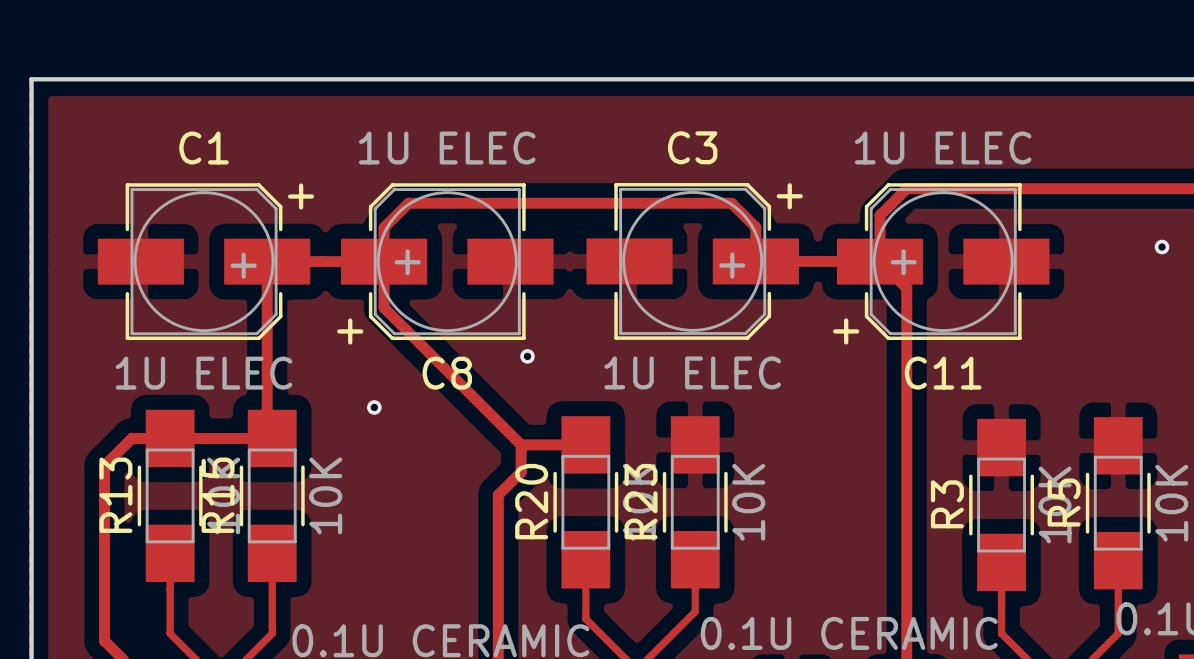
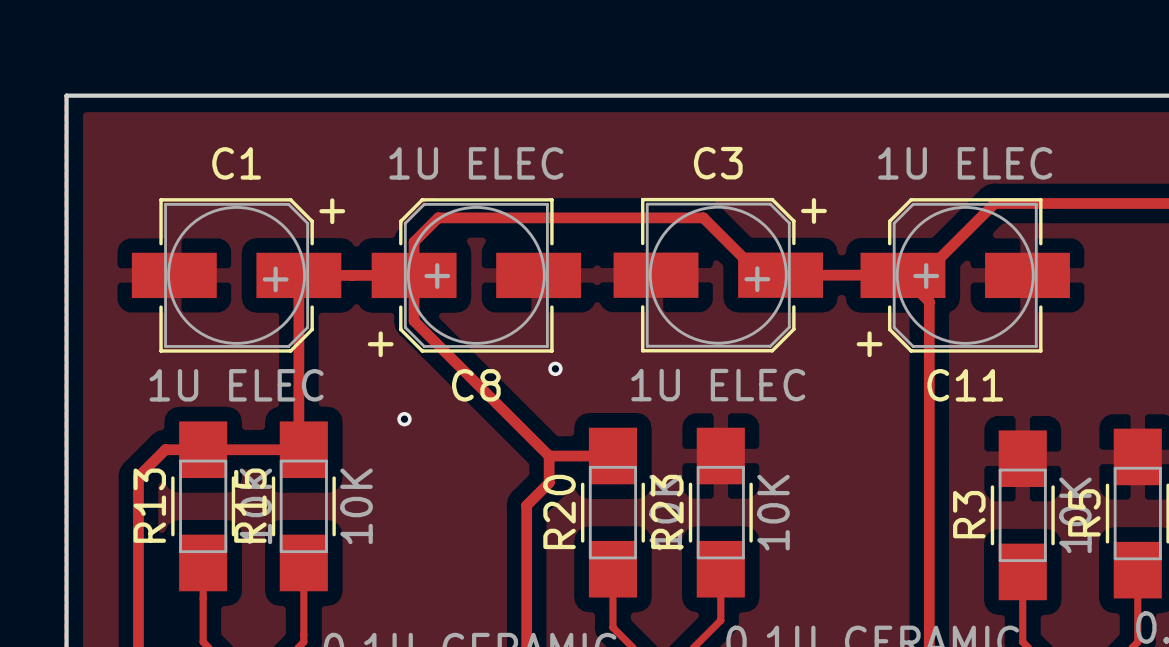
track: (973, 188) (906, 188) (880, 215) (880, 261) -> (994, 203) (922, 275) (902, 275)
track: (677, 203) (731, 203) (755, 227) (755, 261) -> (703, 217) (760, 275) (780, 275)

